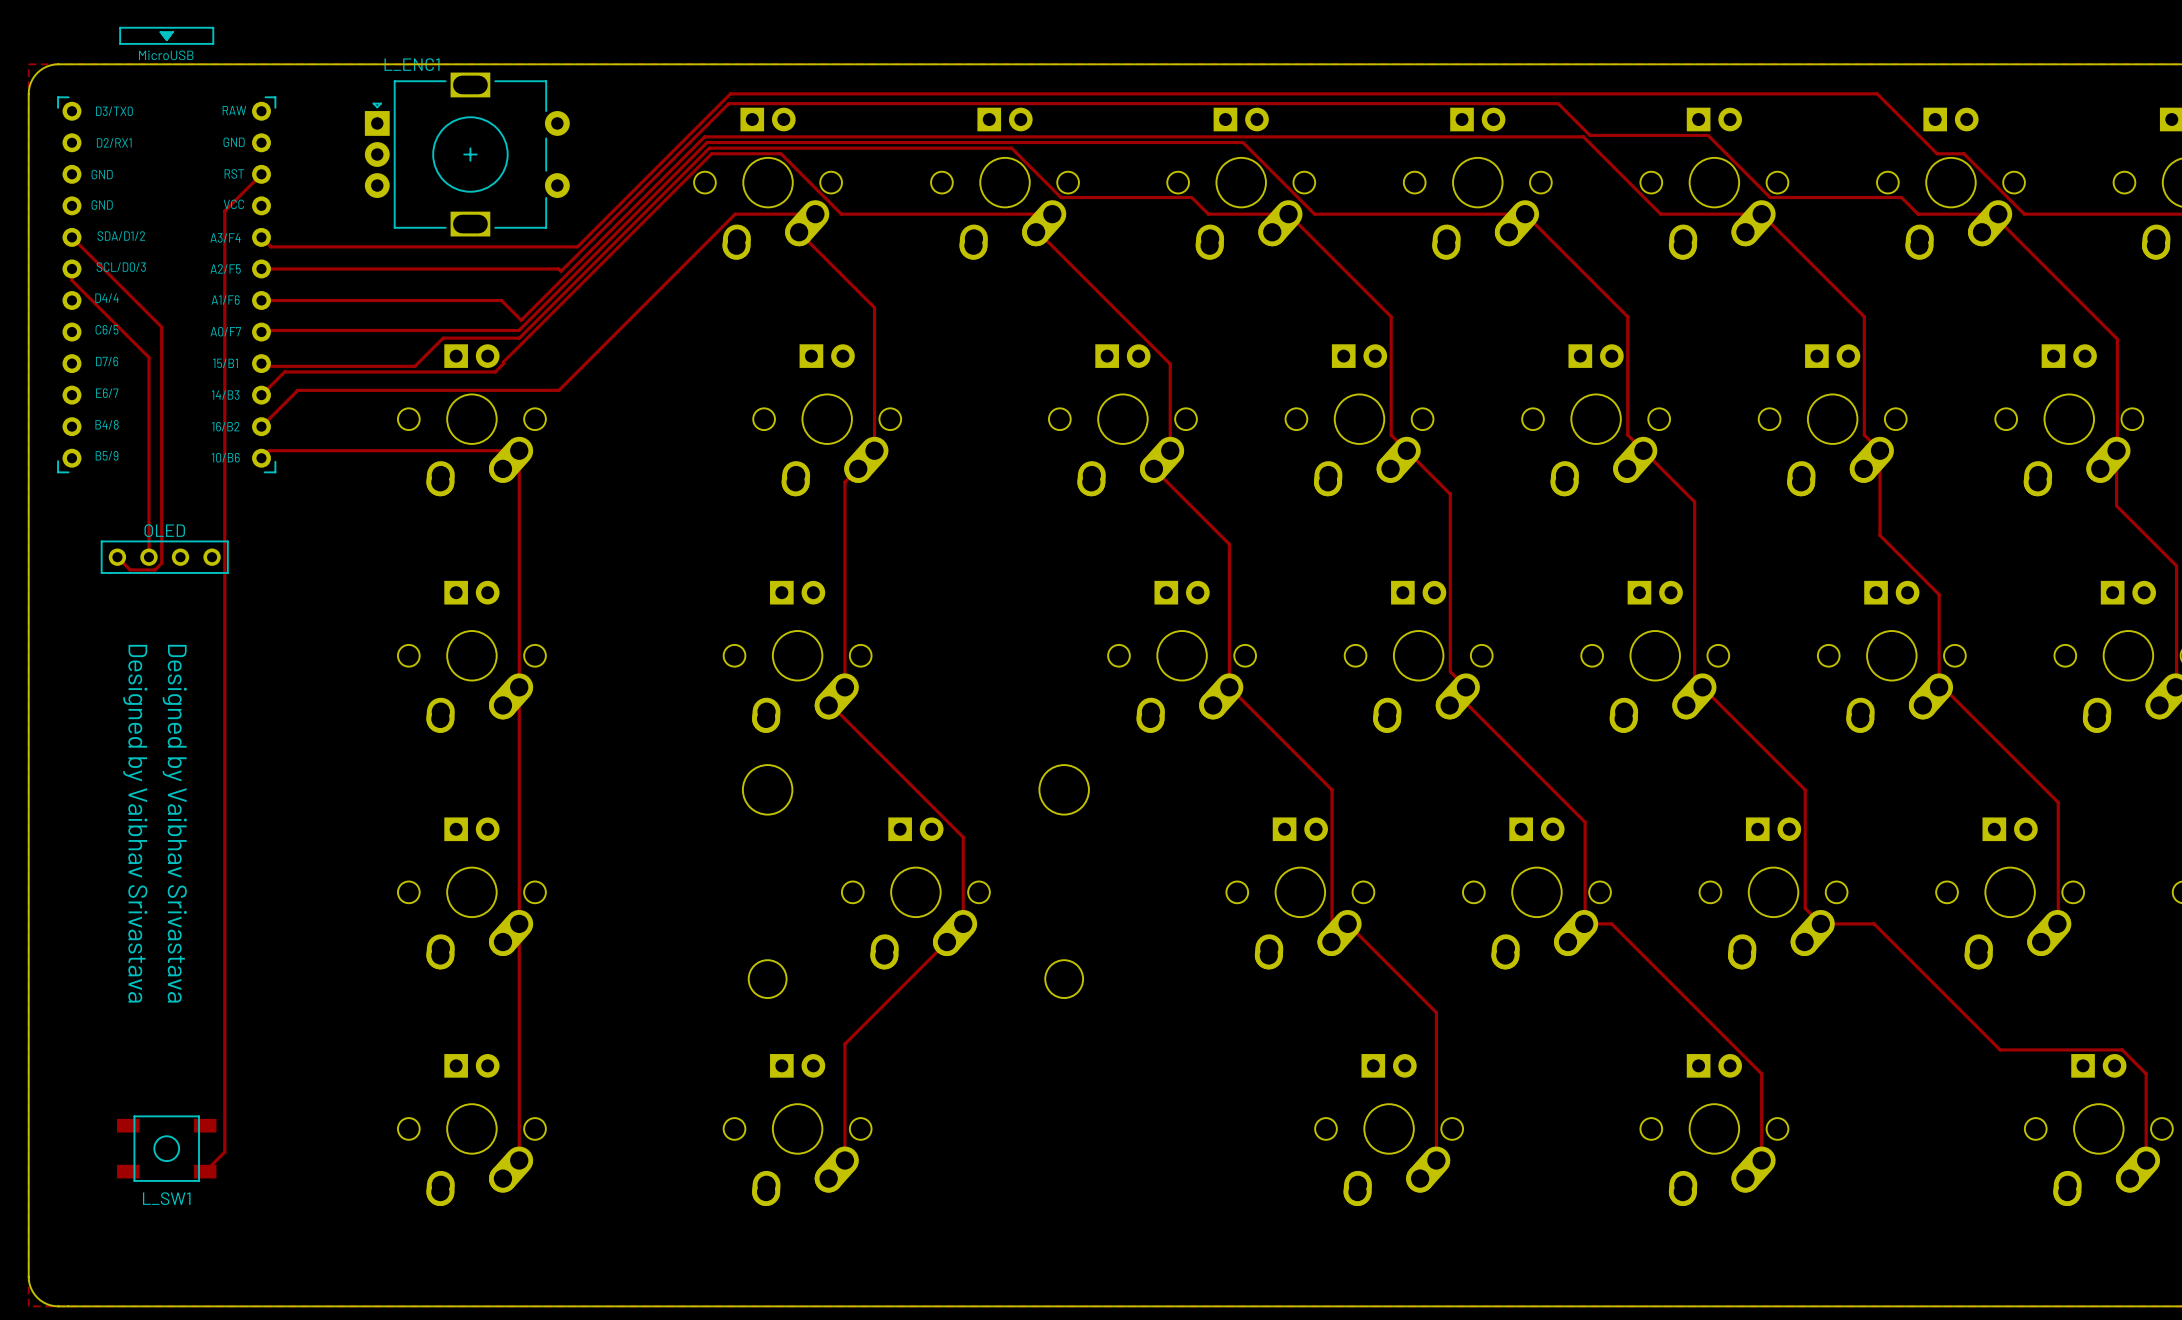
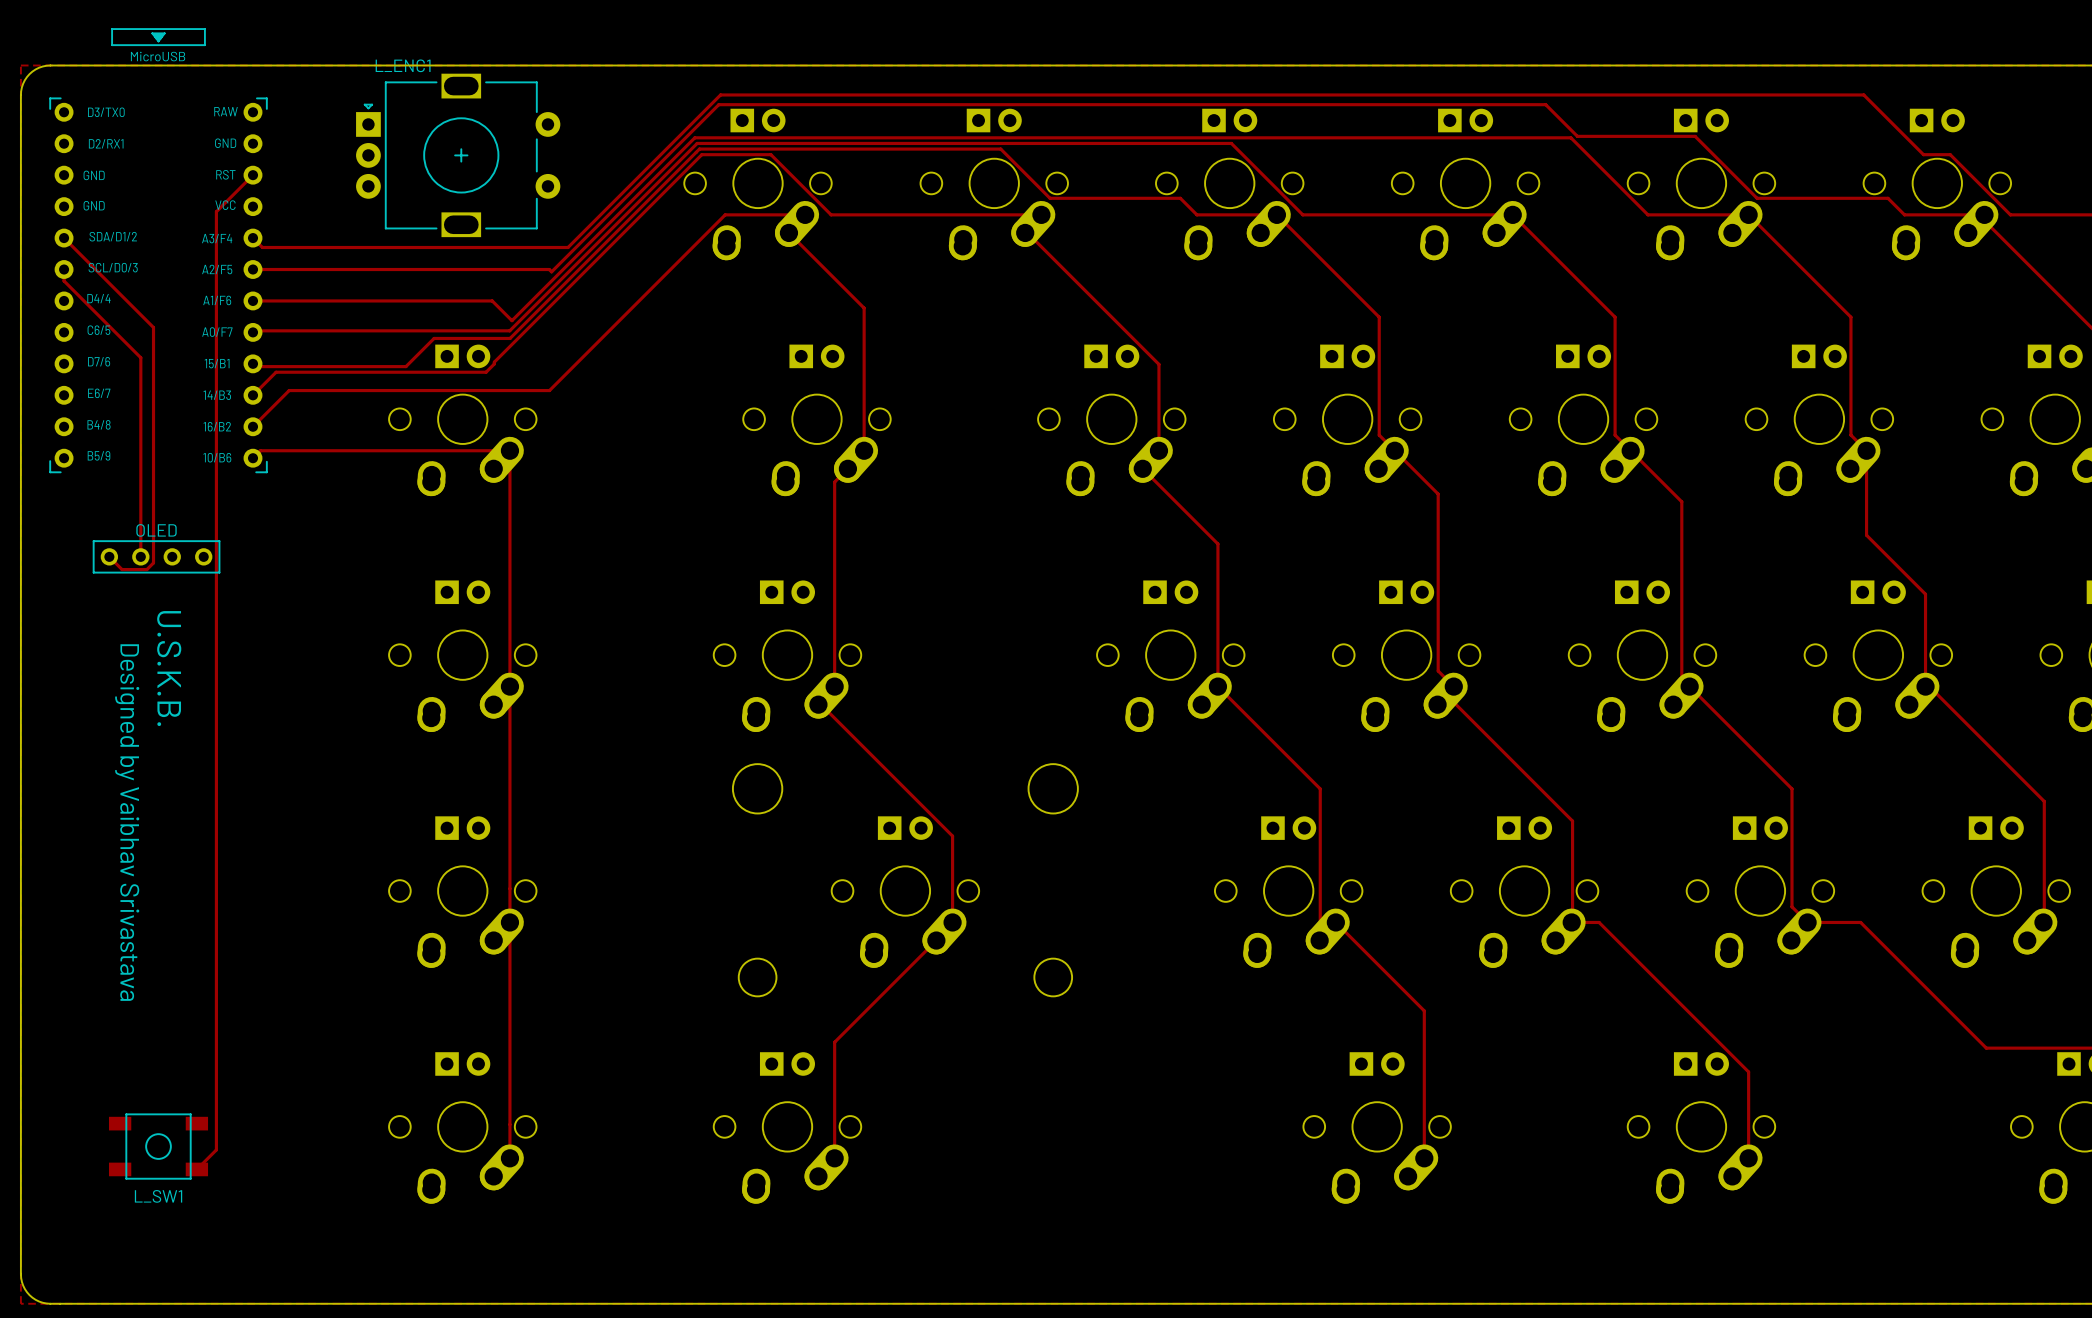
text: none -> U.S.K.B. (169, 668)
text: Designed by Vaibhav Srivastava (174, 823) -> none

